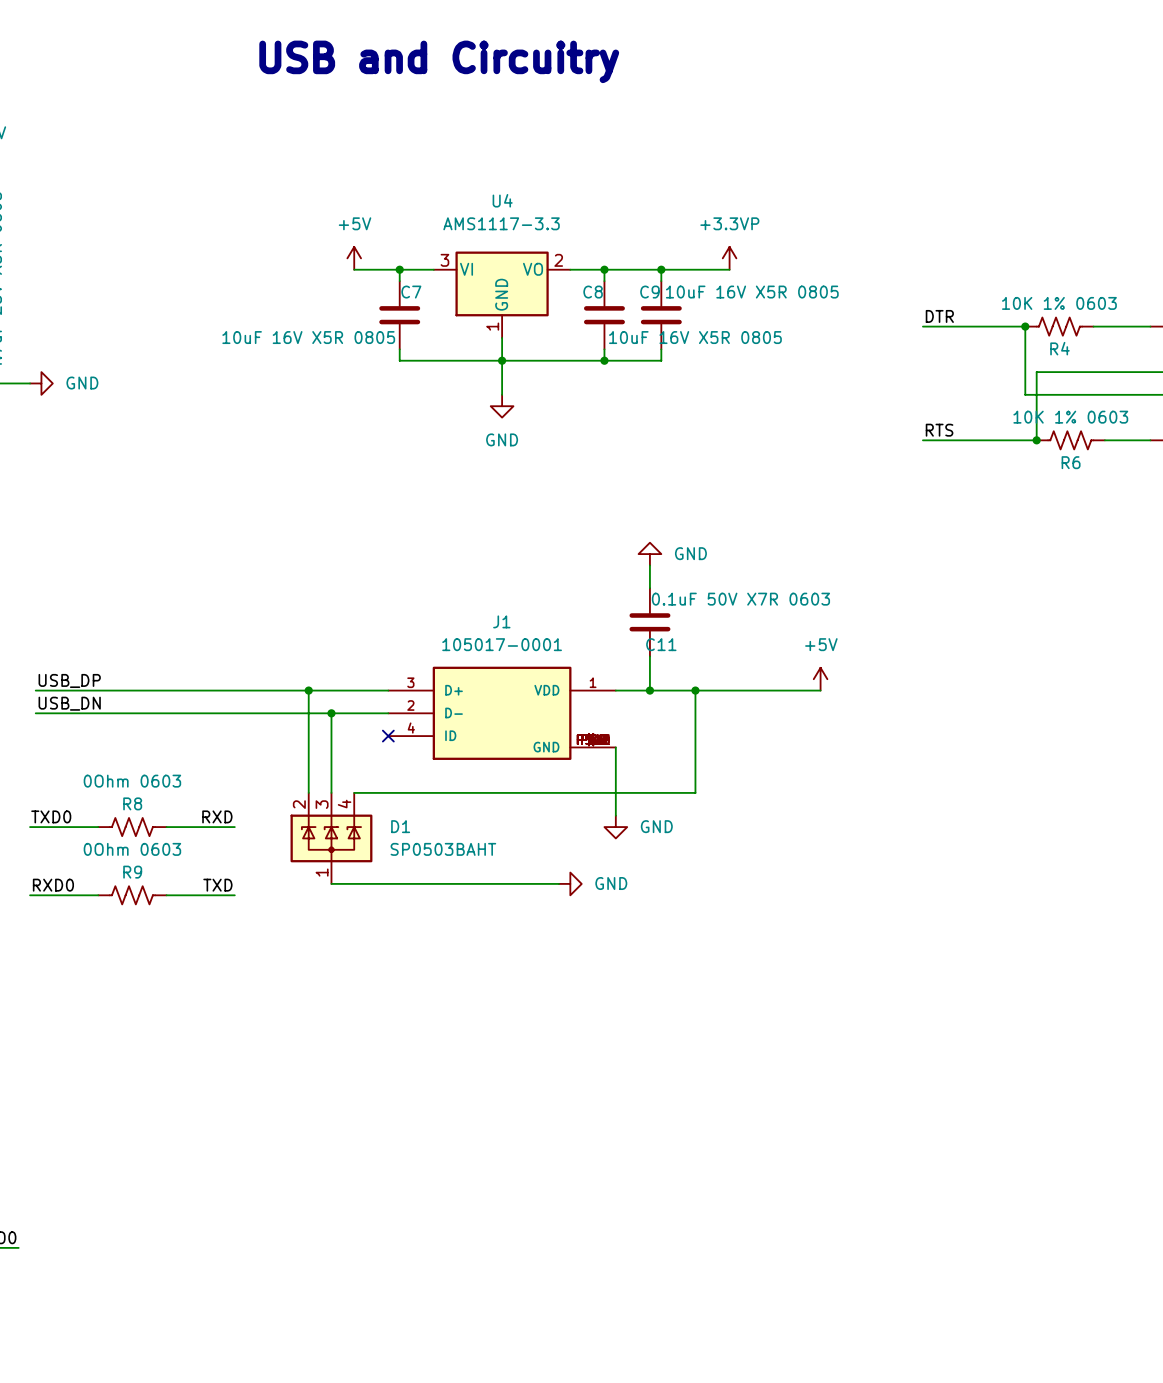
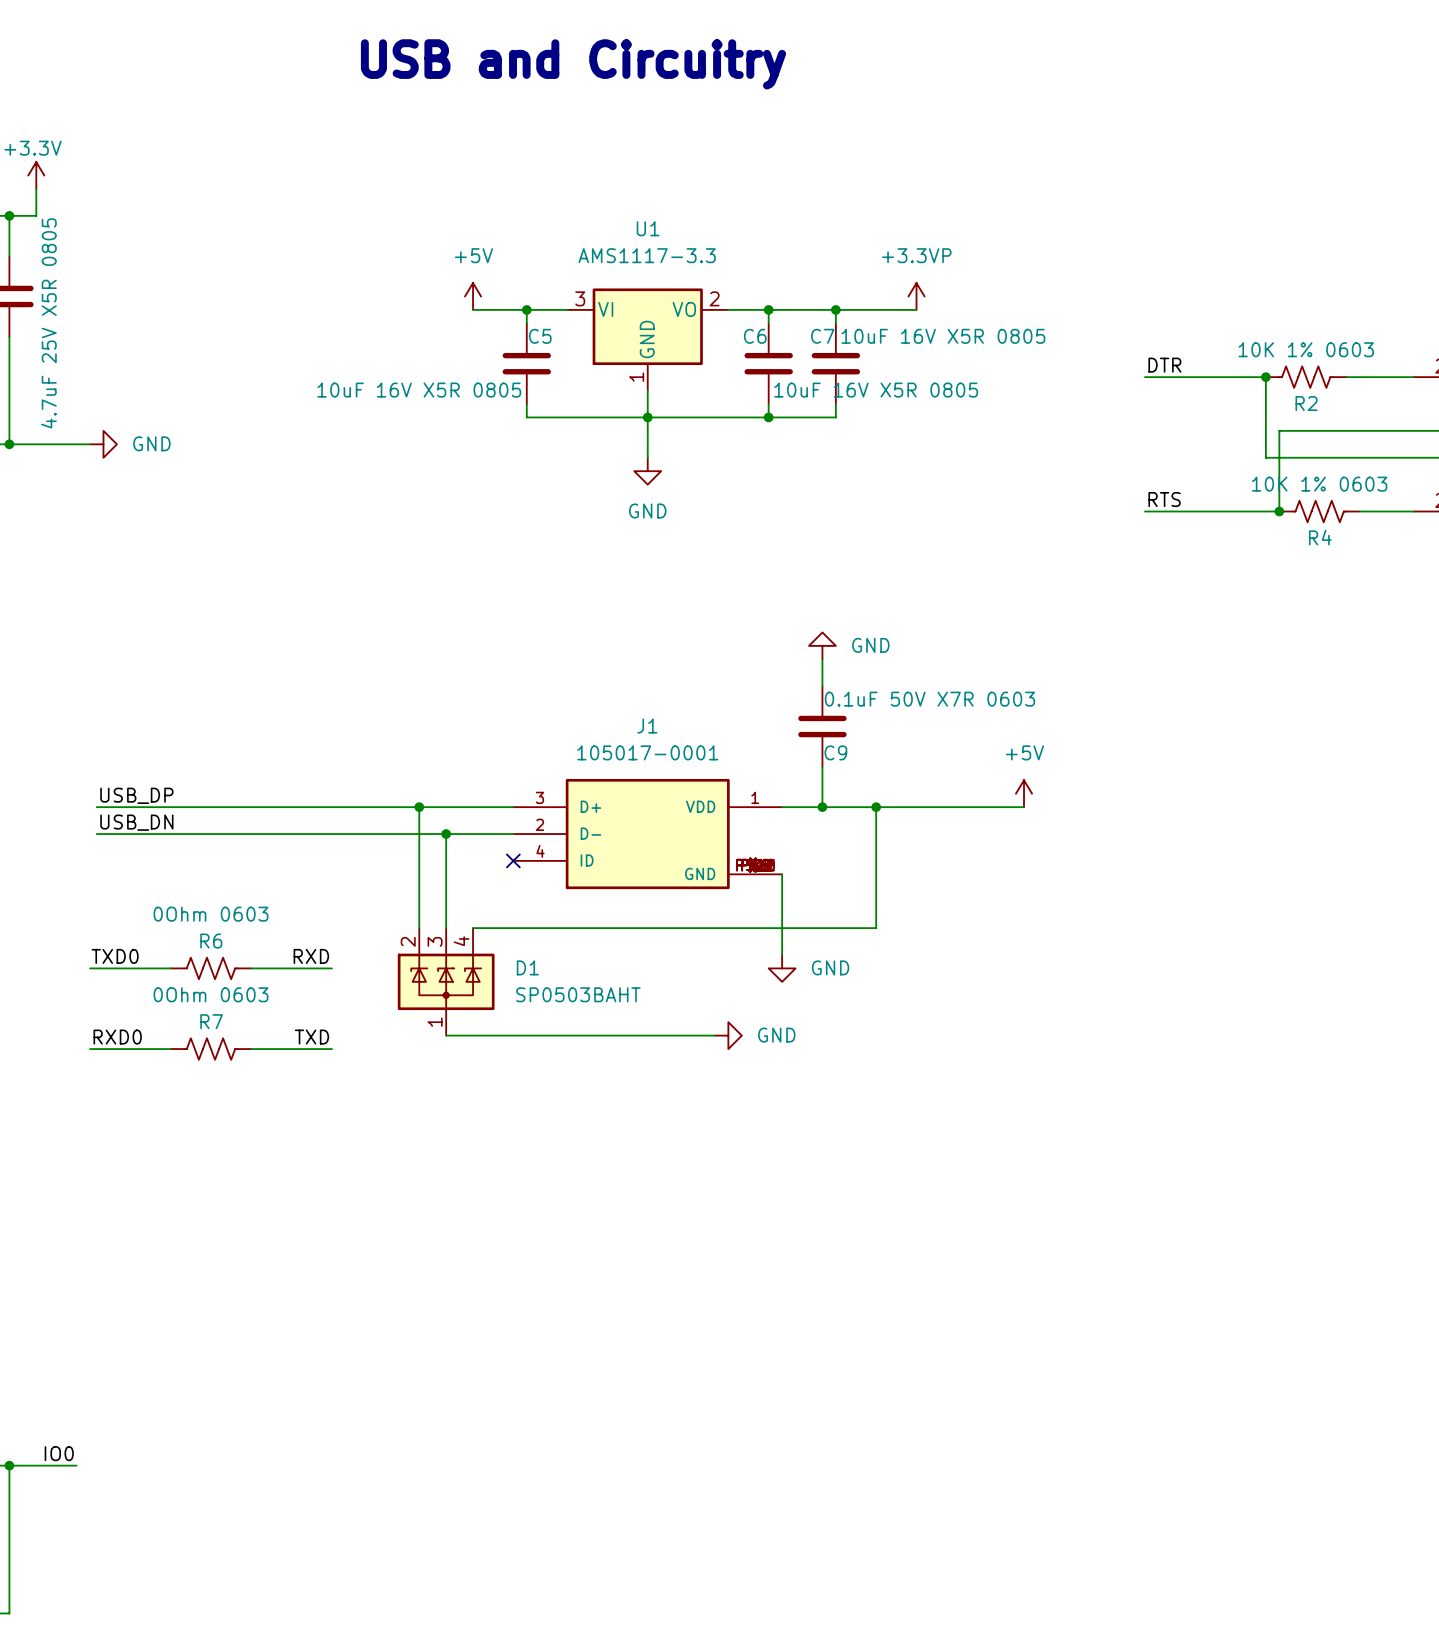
U4 name: U4 (502, 200) -> U1 (648, 228)
C7 name: C7 (411, 292) -> C5 (540, 336)
C8 name: C8 (593, 292) -> C6 (755, 336)
C9 name: C9 (649, 292) -> C7 (822, 336)
R4 name: R4 (1059, 348) -> R2 (1306, 403)
R6 name: R6 (1071, 462) -> R4 (1320, 537)
C11 name: C11 (661, 644) -> C9 (835, 752)
R8 name: R8 (132, 803) -> R6 (211, 941)
R9 name: R9 (132, 872) -> R7 (211, 1021)

